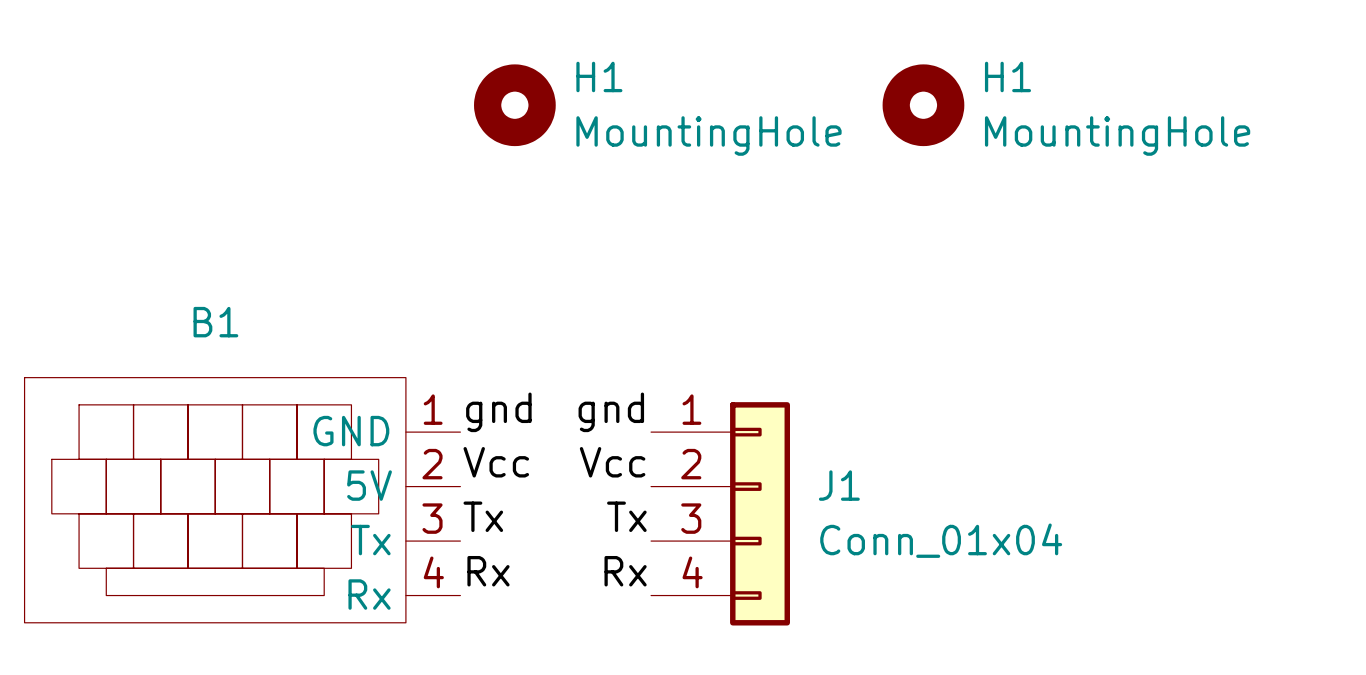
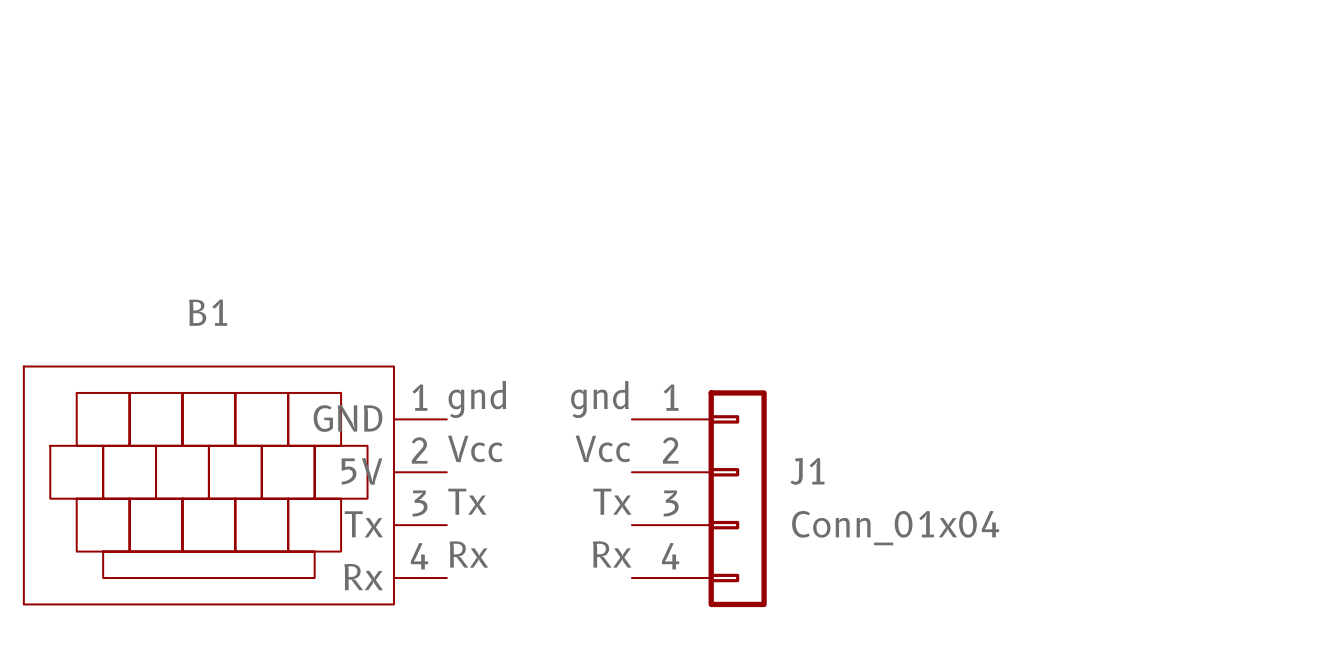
H1: MountingHole (514, 105) -> none
H1: MountingHole (923, 105) -> none

